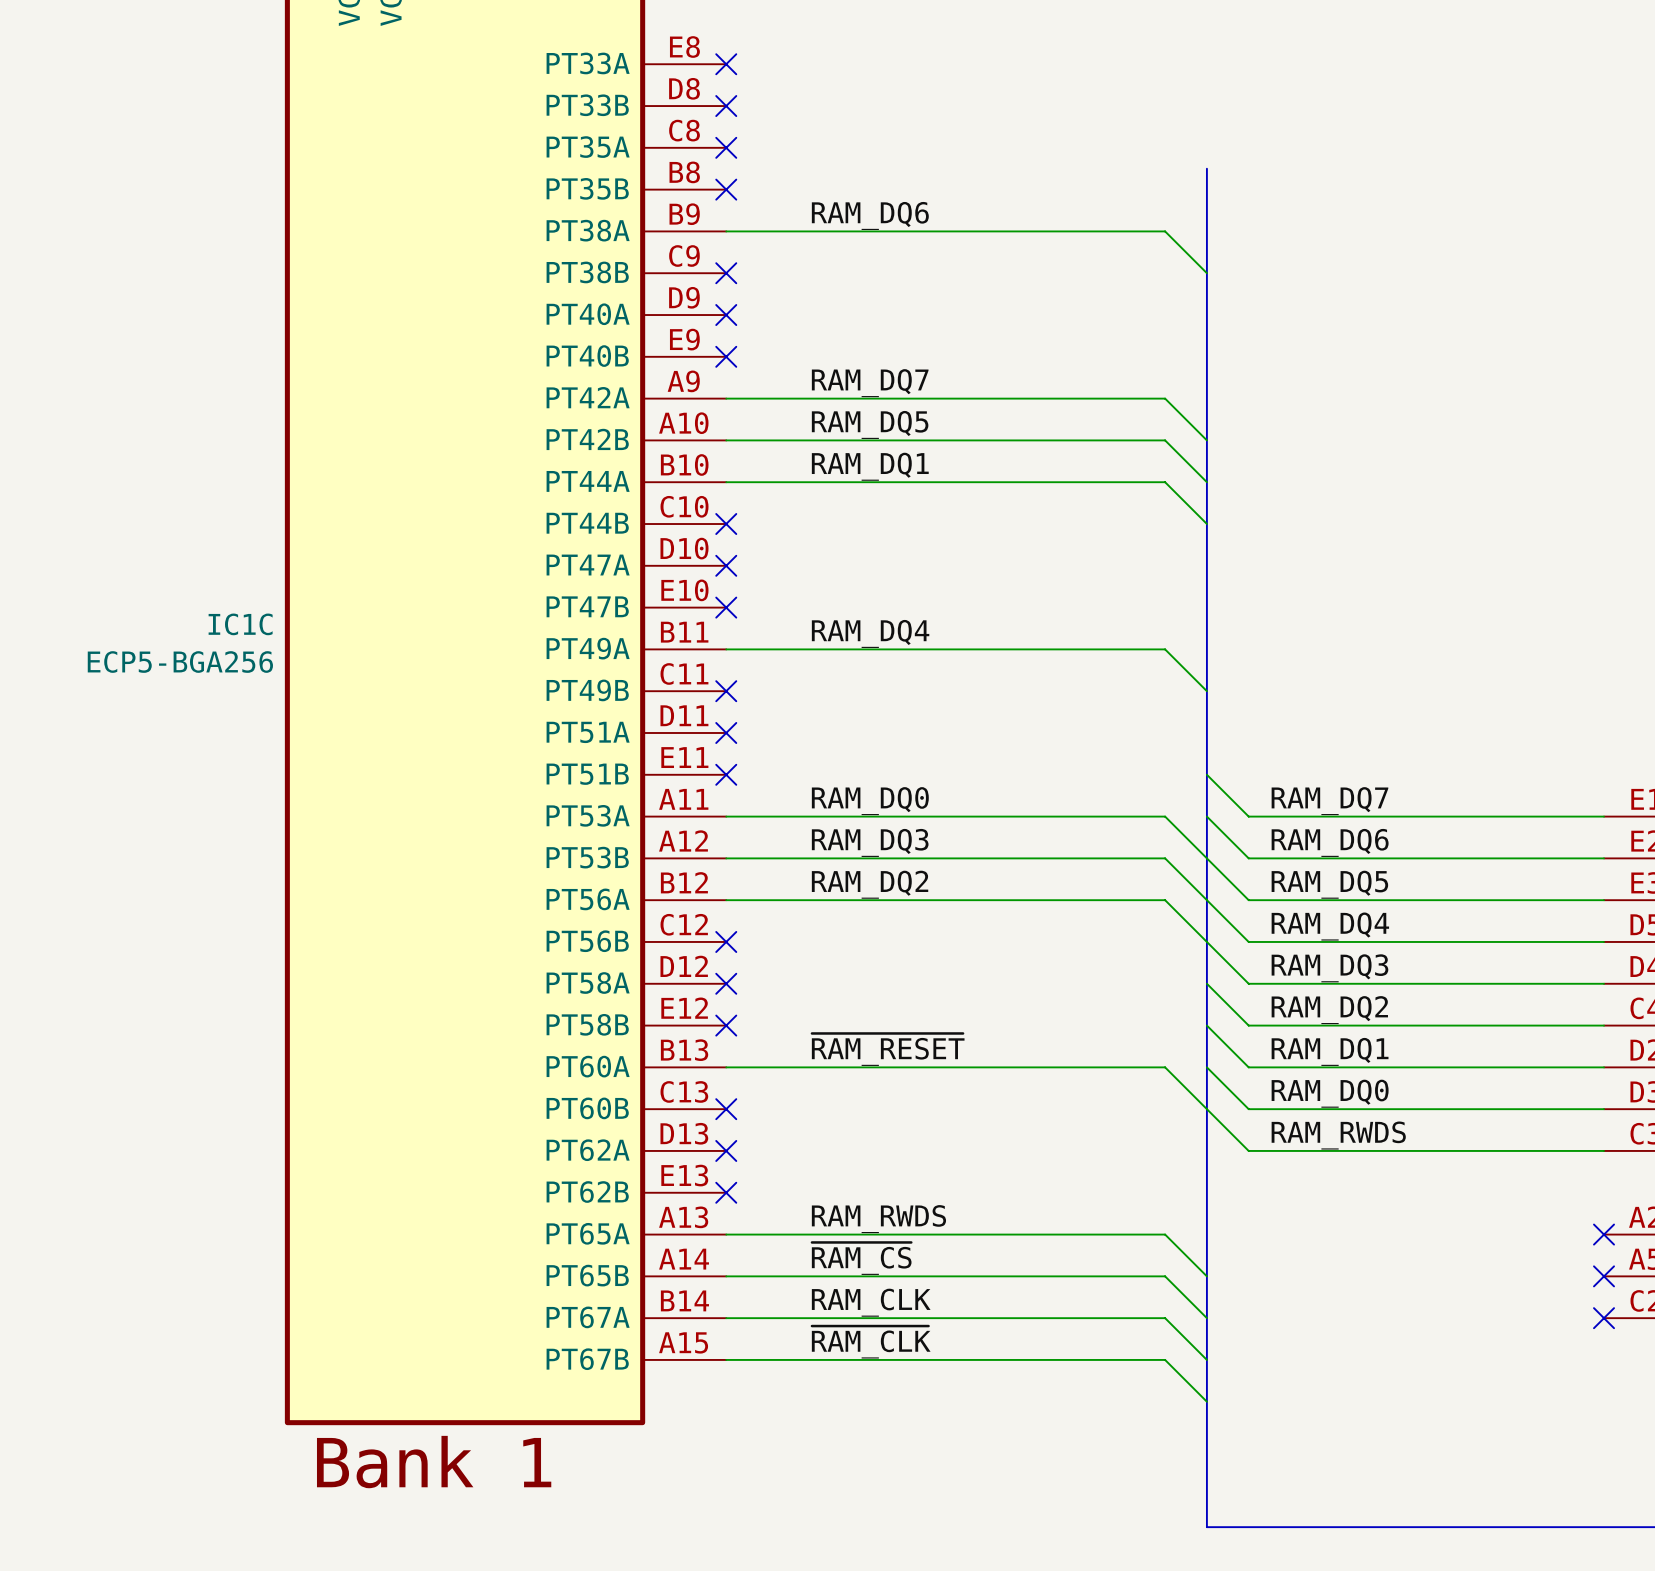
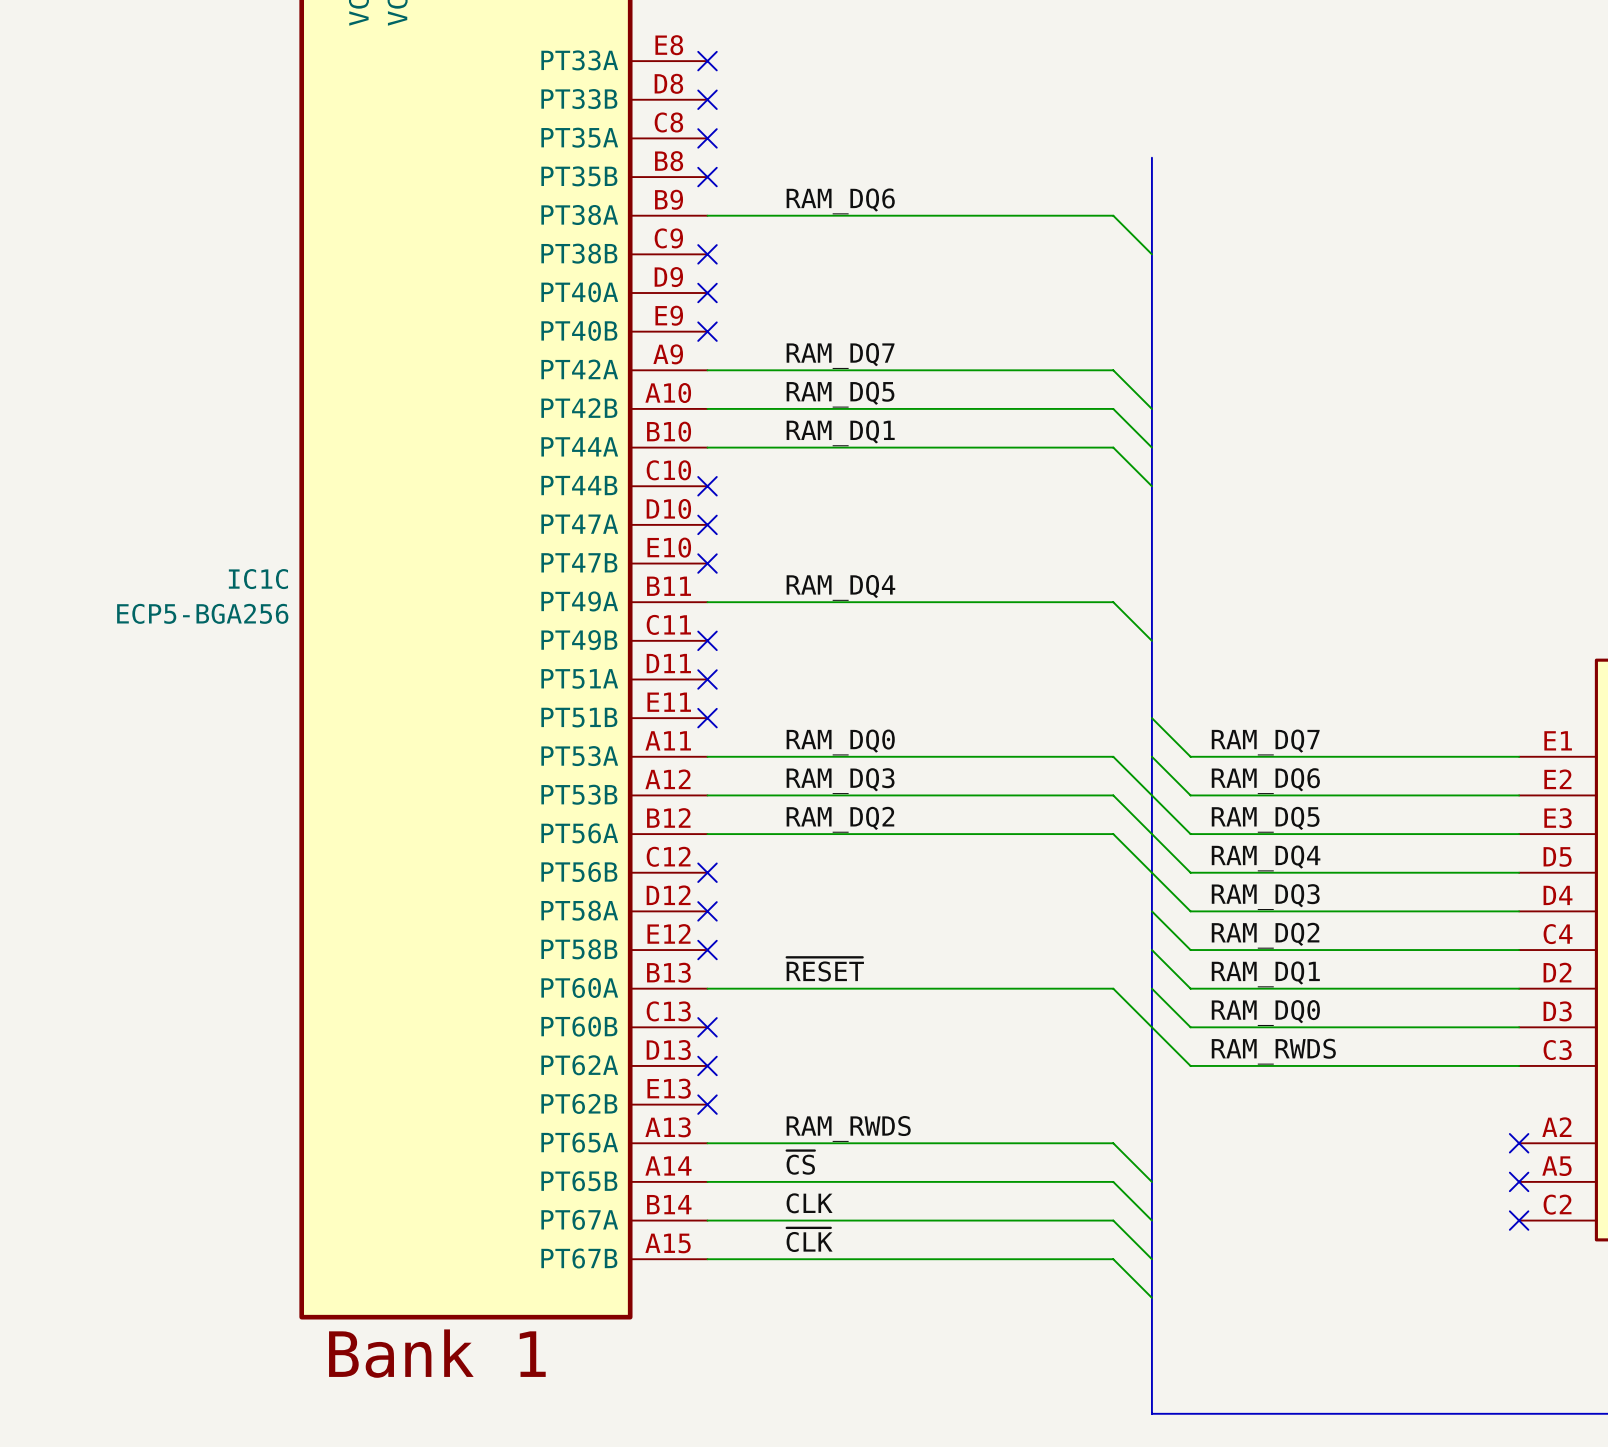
label: ~{RAM_RESET} (888, 1049) -> ~{RESET} (825, 969)
label: ~{RAM_CS} (861, 1258) -> ~{CS} (800, 1162)
label: RAM_CLK (871, 1302) -> CLK (809, 1203)
label: ~{RAM_CLK} (871, 1342) -> ~{CLK} (809, 1239)

